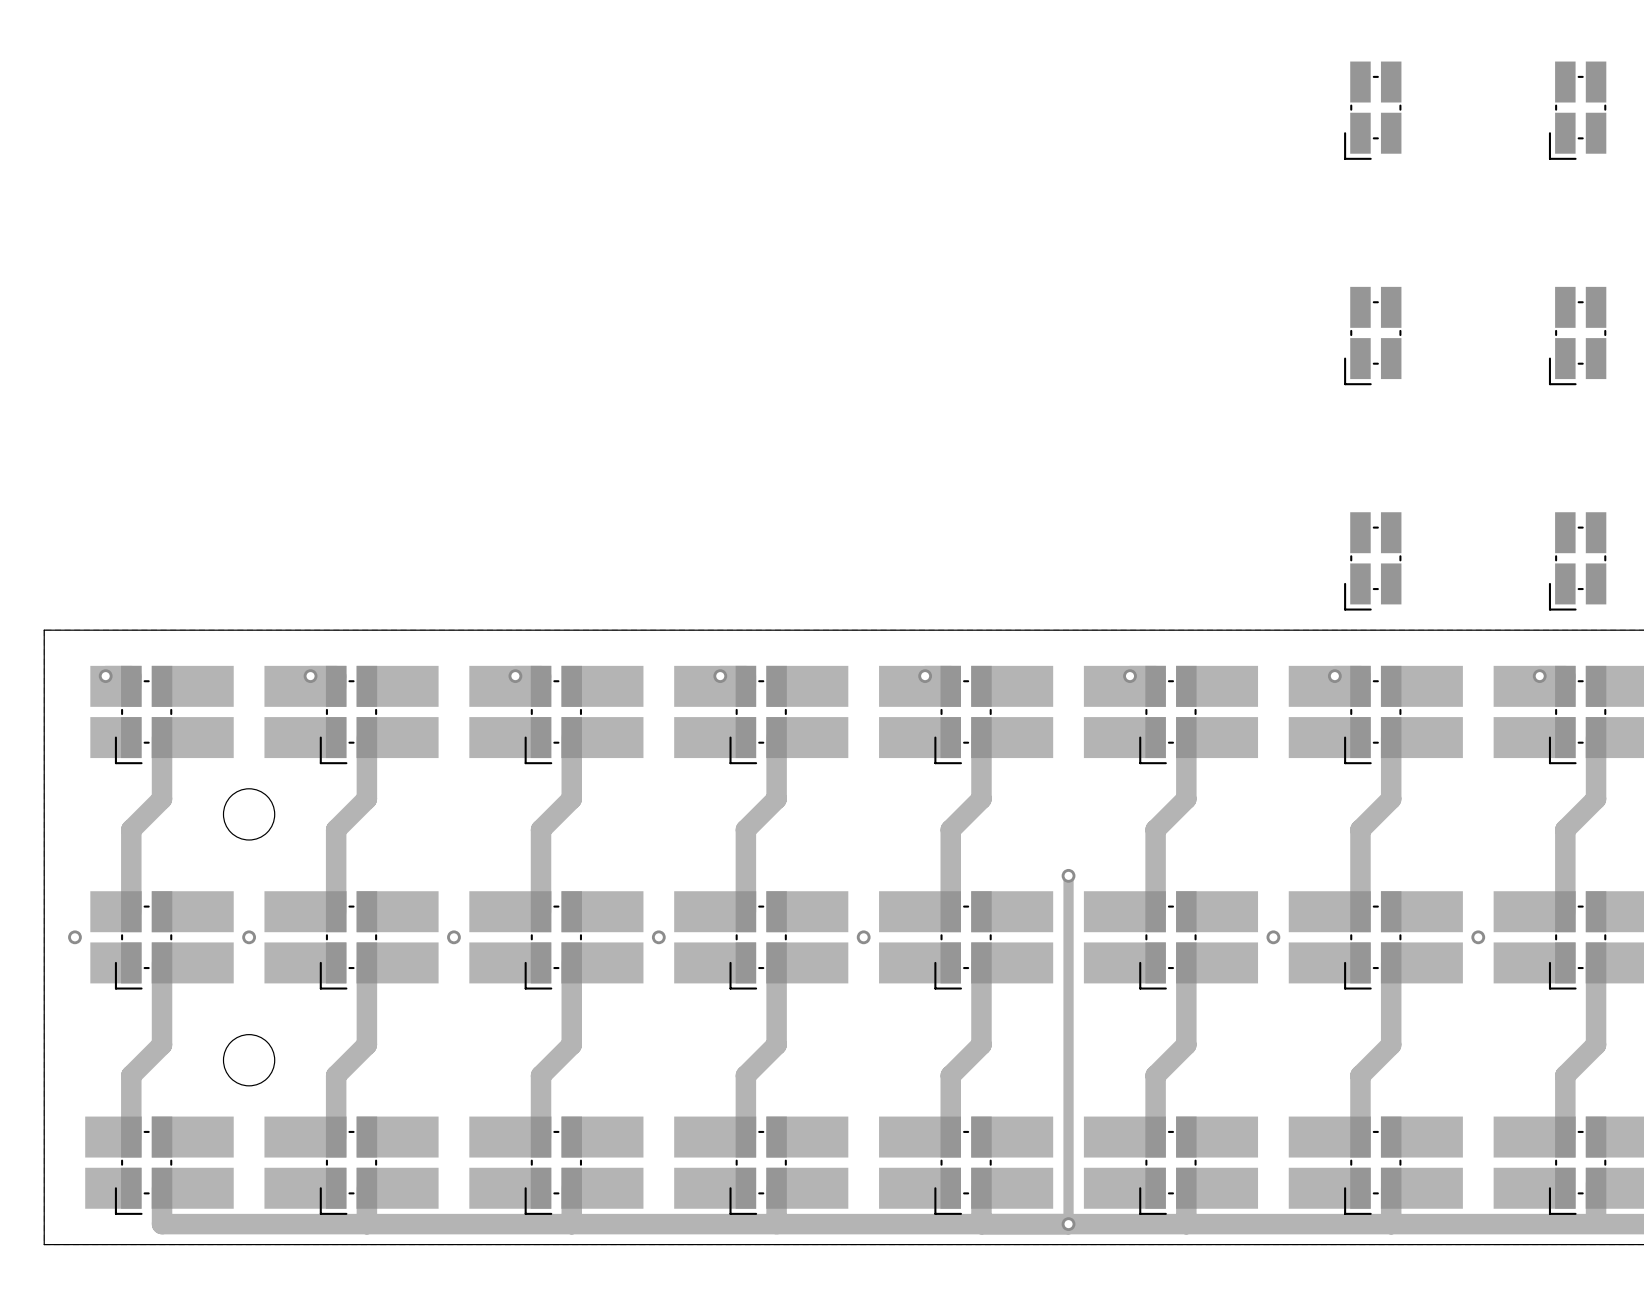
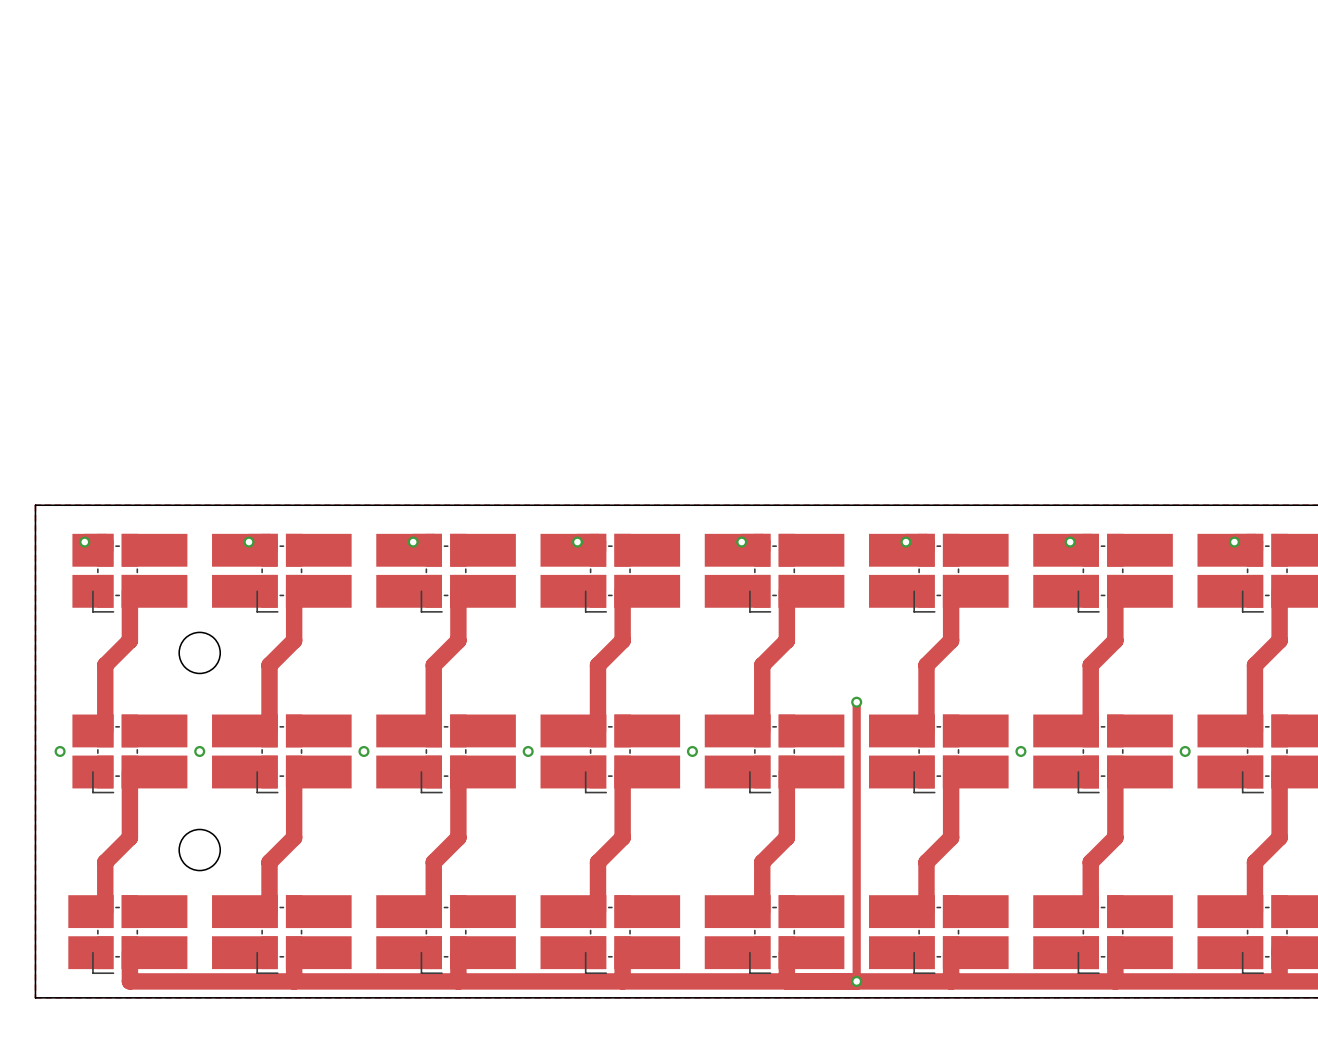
part: (1372, 110) -> none
part: (1577, 110) -> none
part: (1372, 336) -> none
part: (1577, 336) -> none
part: (1372, 561) -> none
part: (1577, 561) -> none

